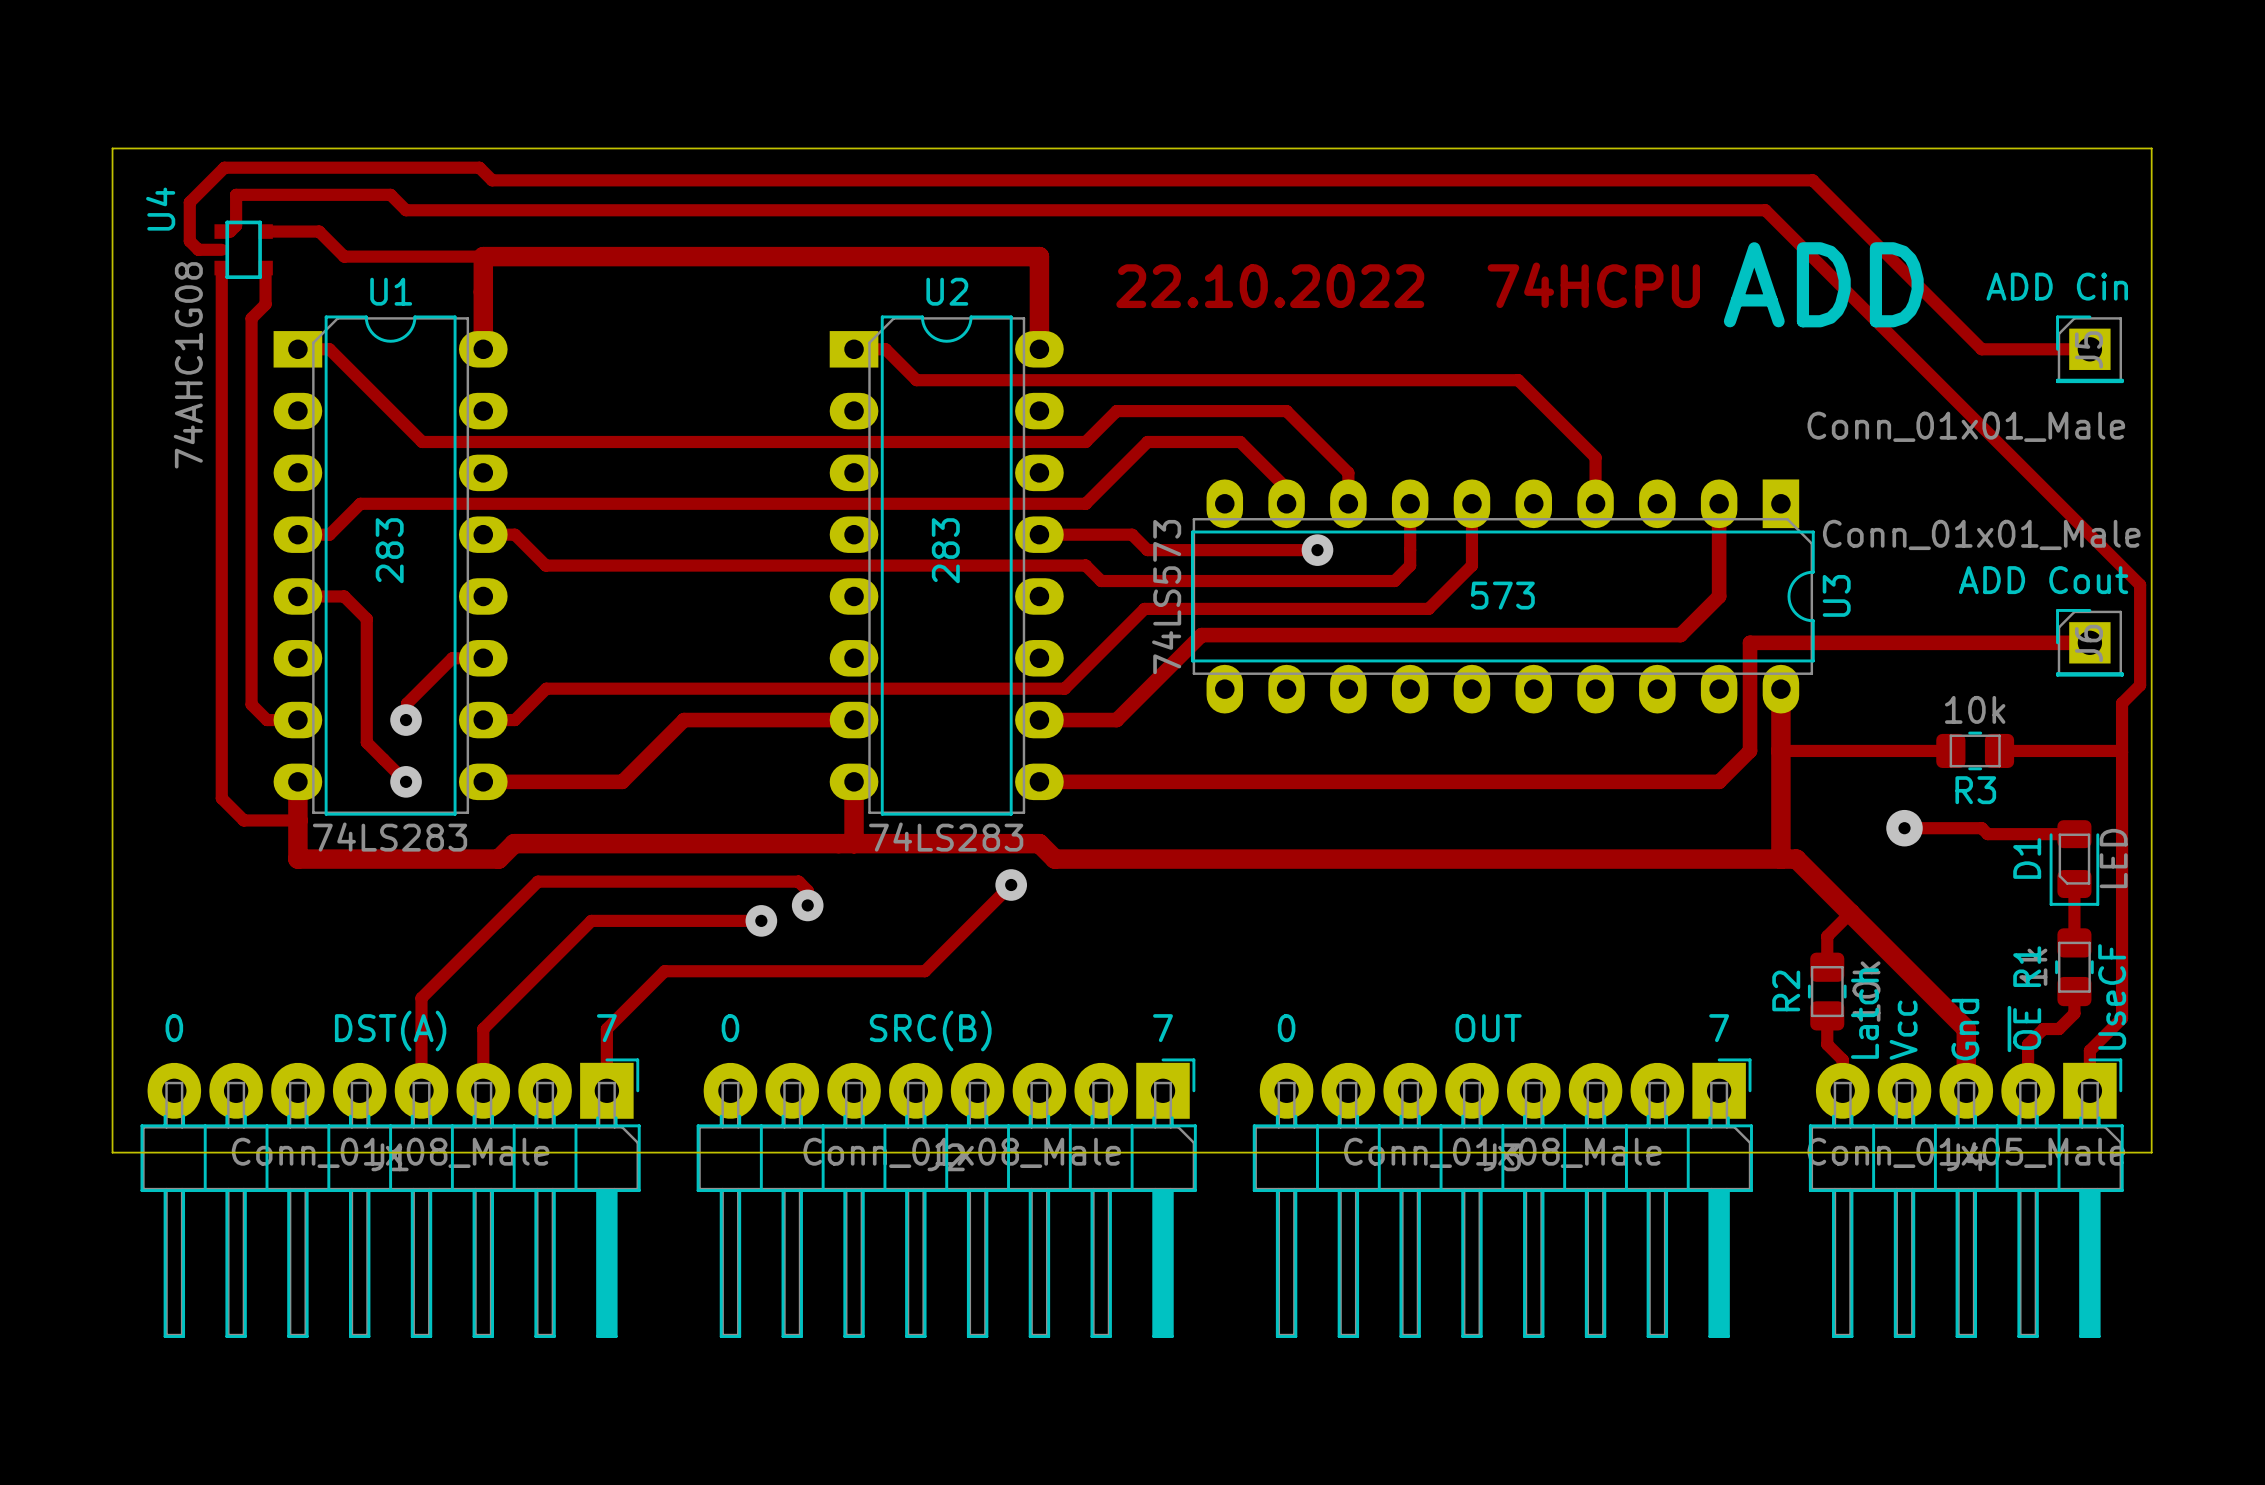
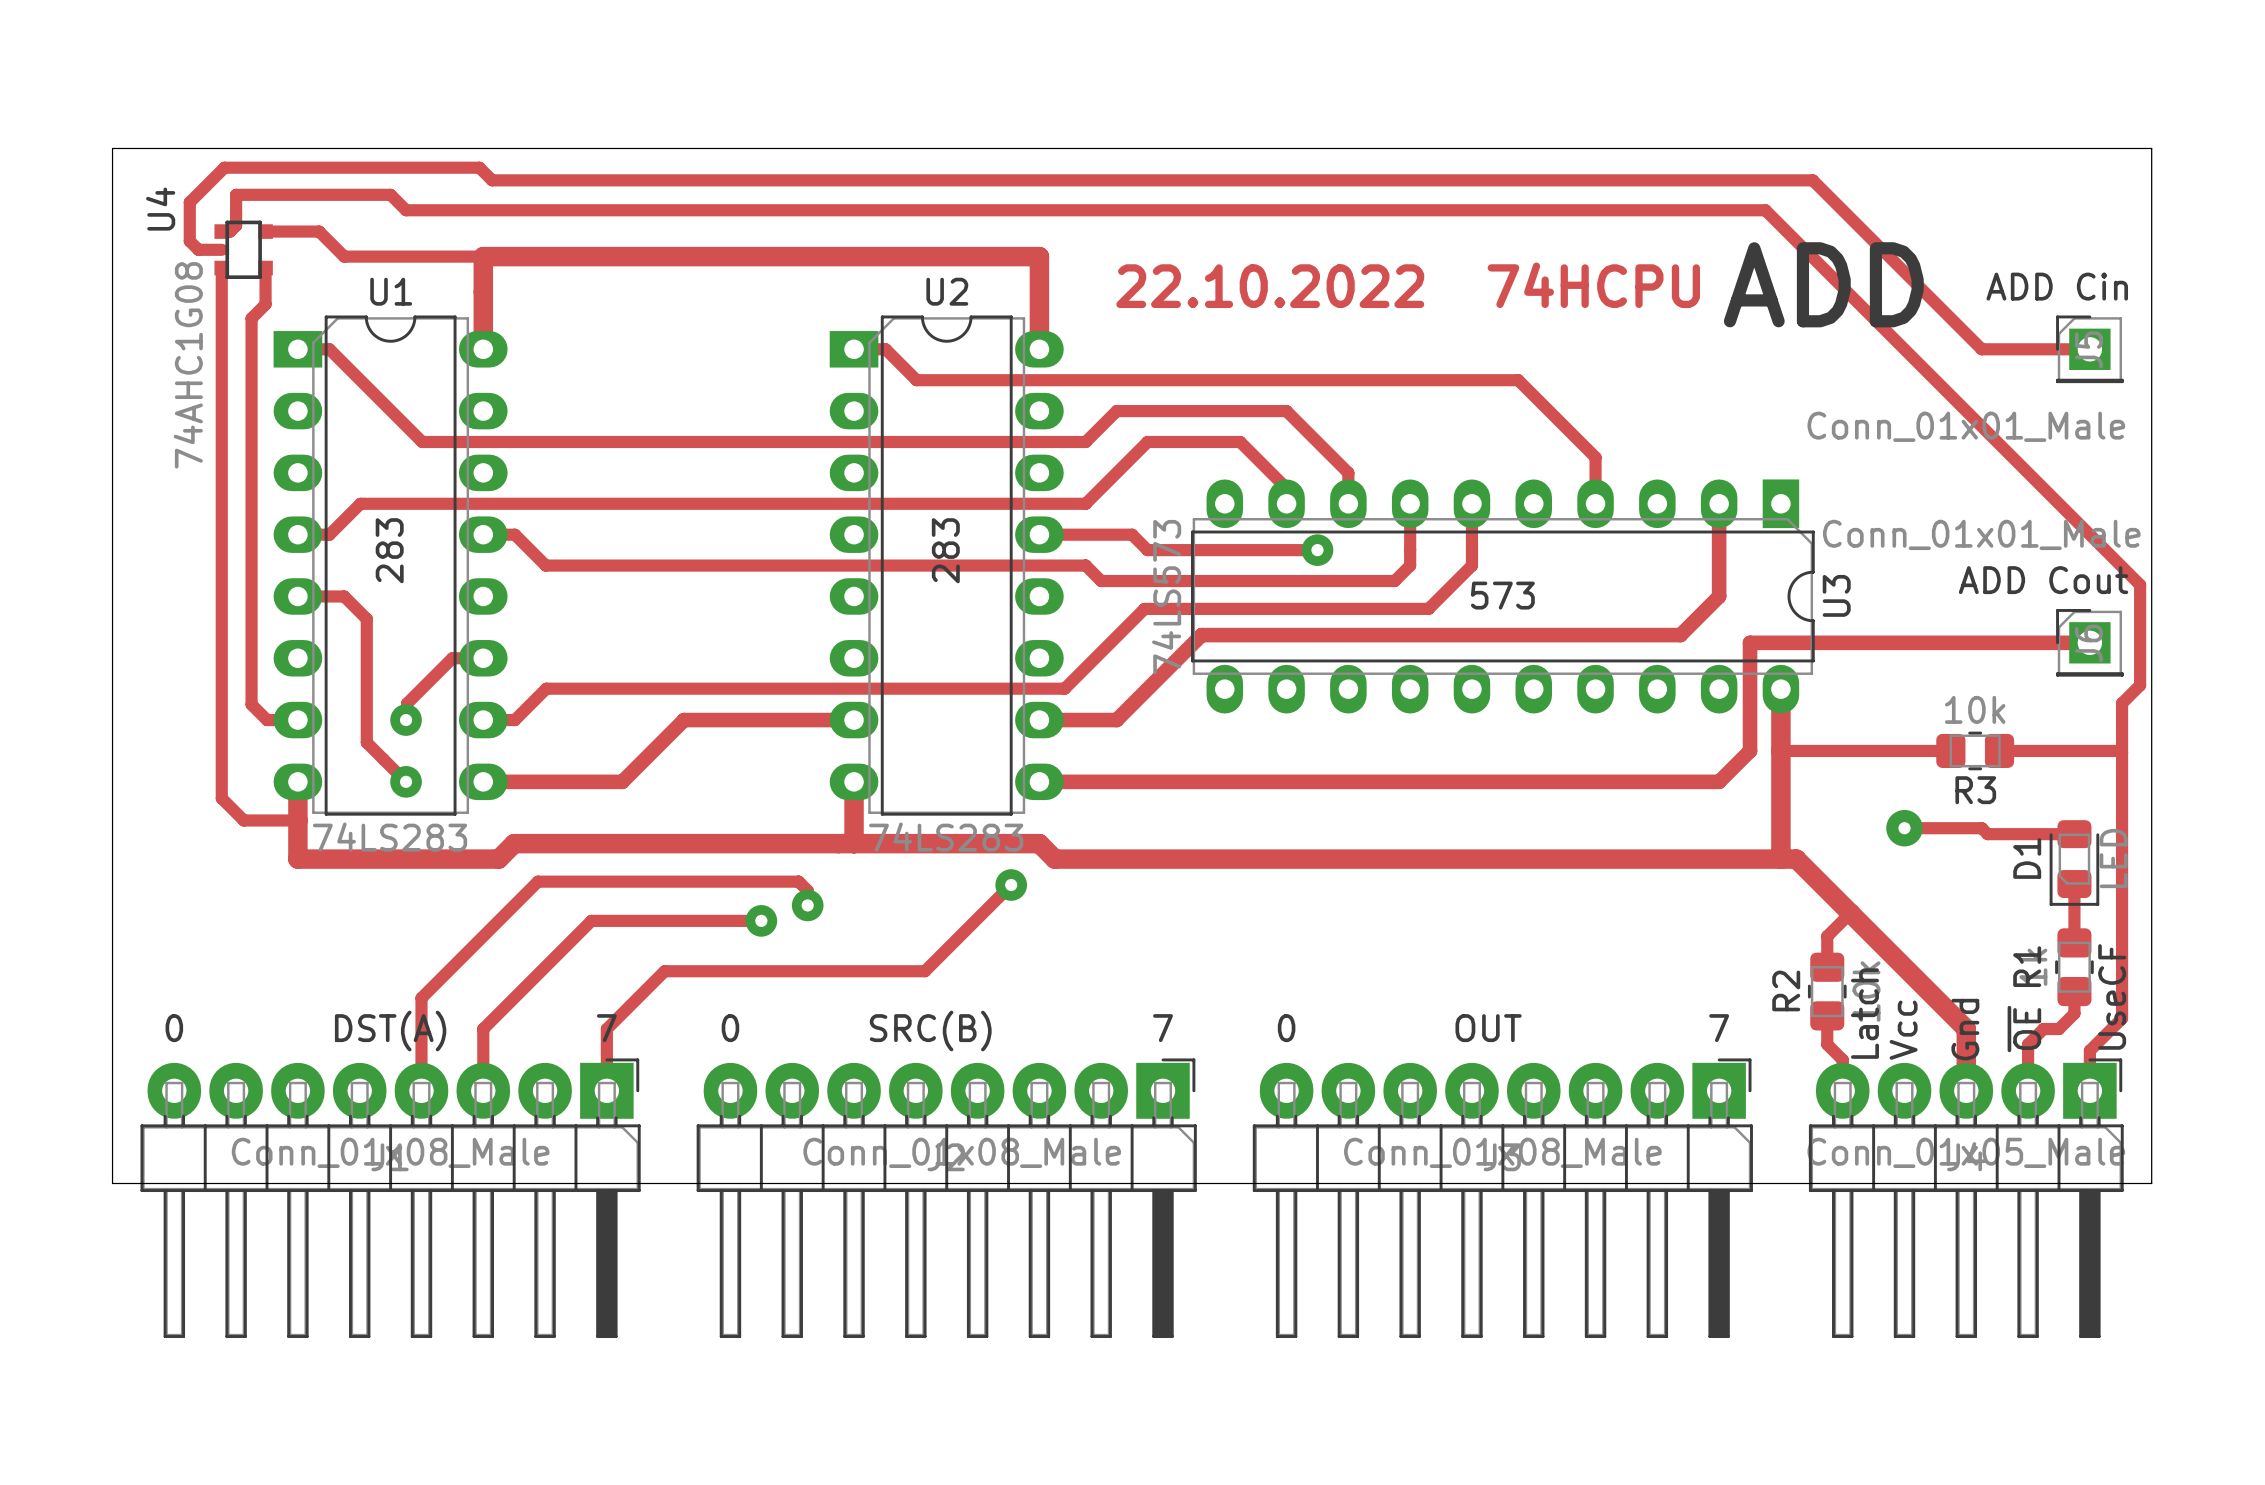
board edge: (112, 1152) (2151, 1152) -> (112, 1152) (112, 1183) (2151, 1183) (2151, 1152)

